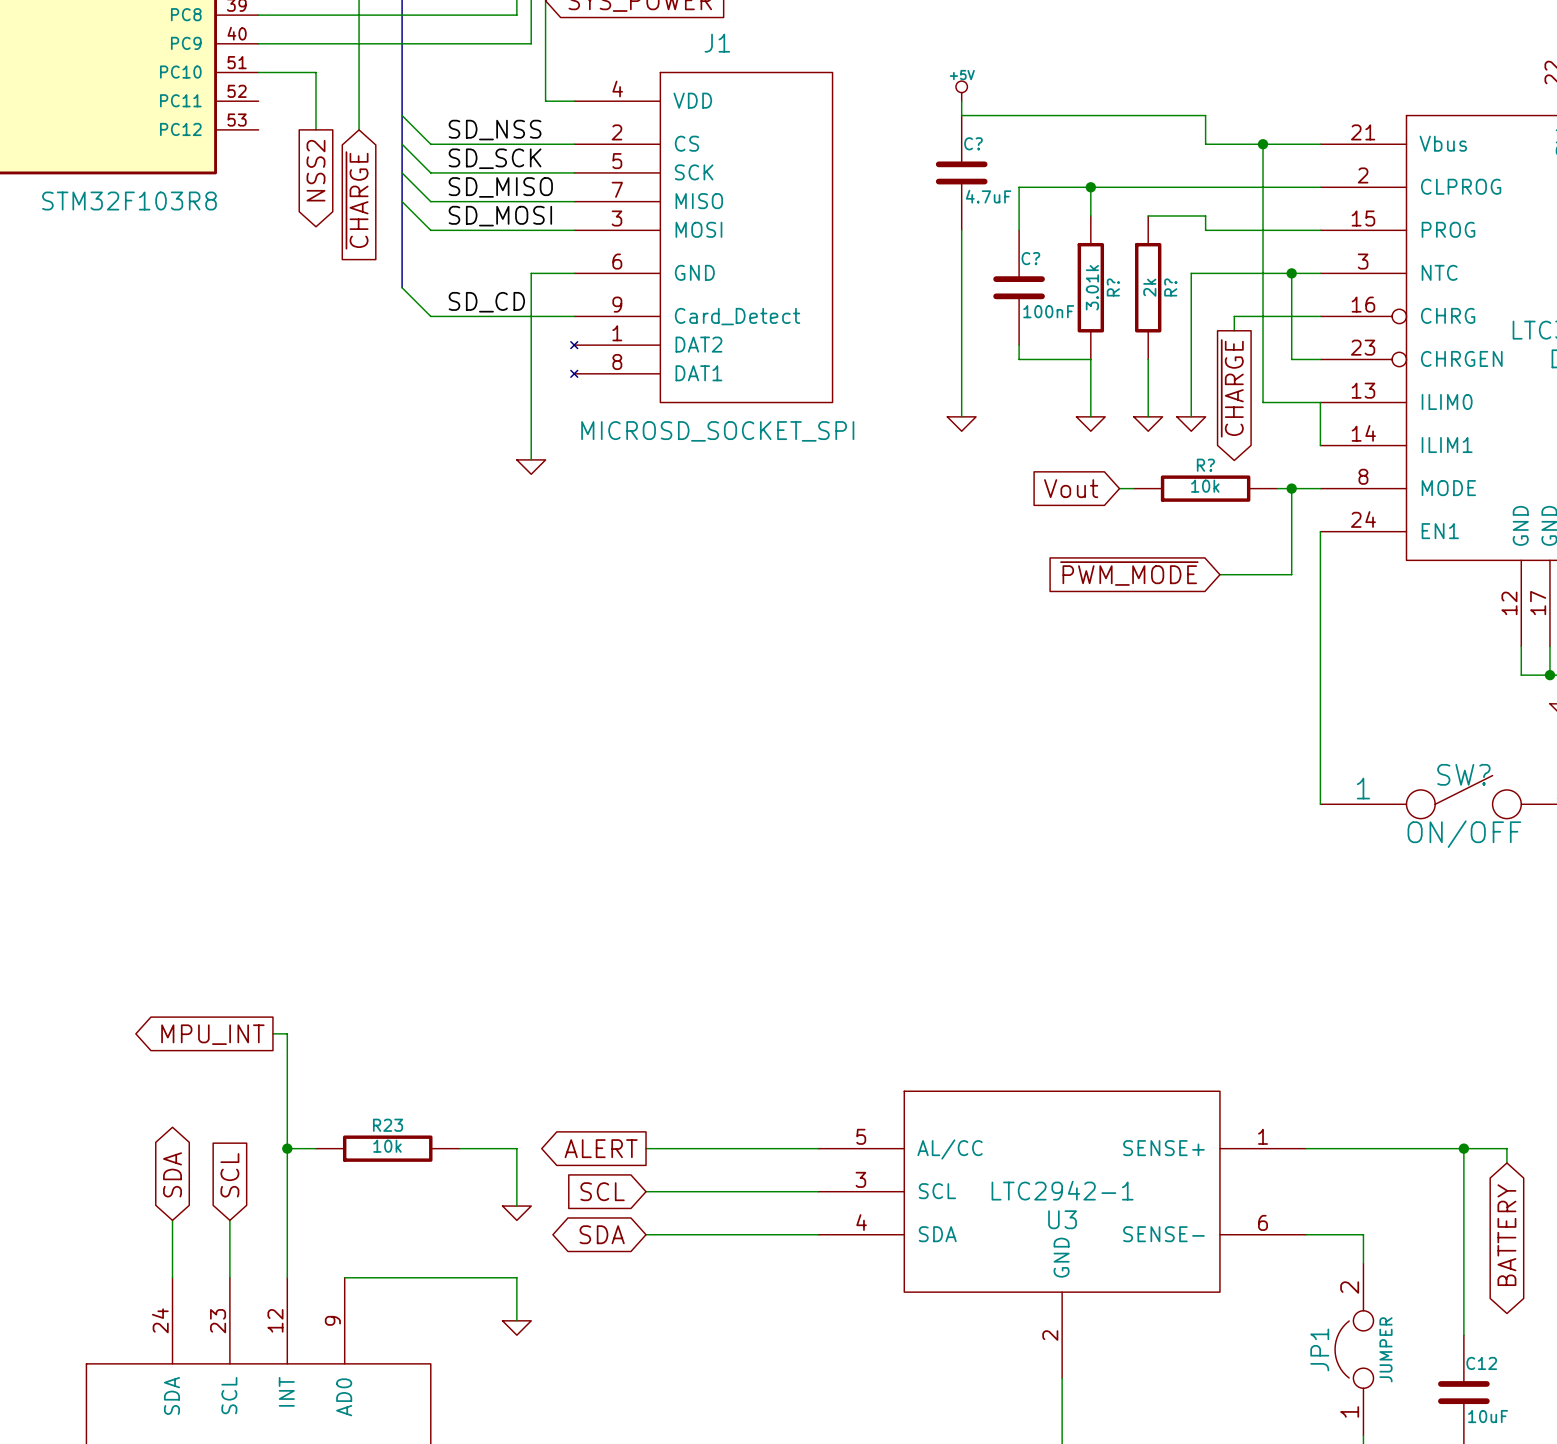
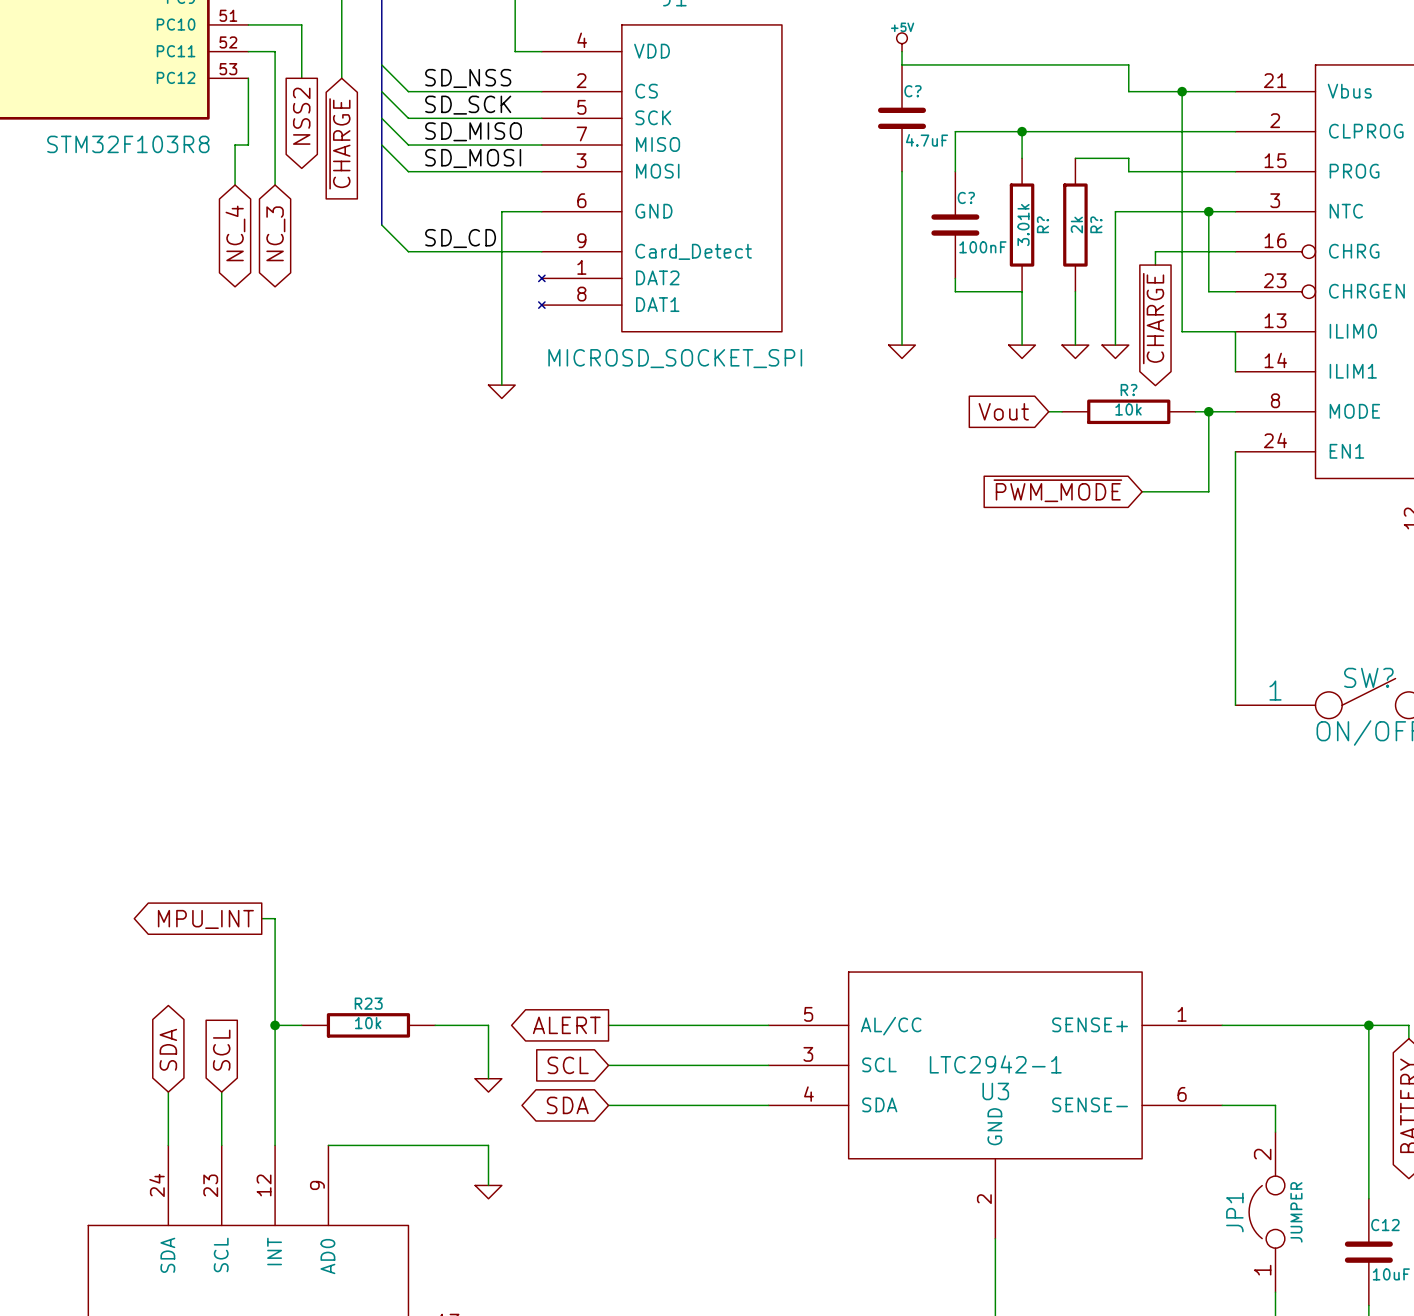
wire: none -> (248, 51) (275, 51) (275, 185)
wire: none -> (248, 78) (248, 145) (235, 145) (235, 185)
global label: none -> NC_4 (235, 233)
global label: none -> NC_3 (275, 233)

